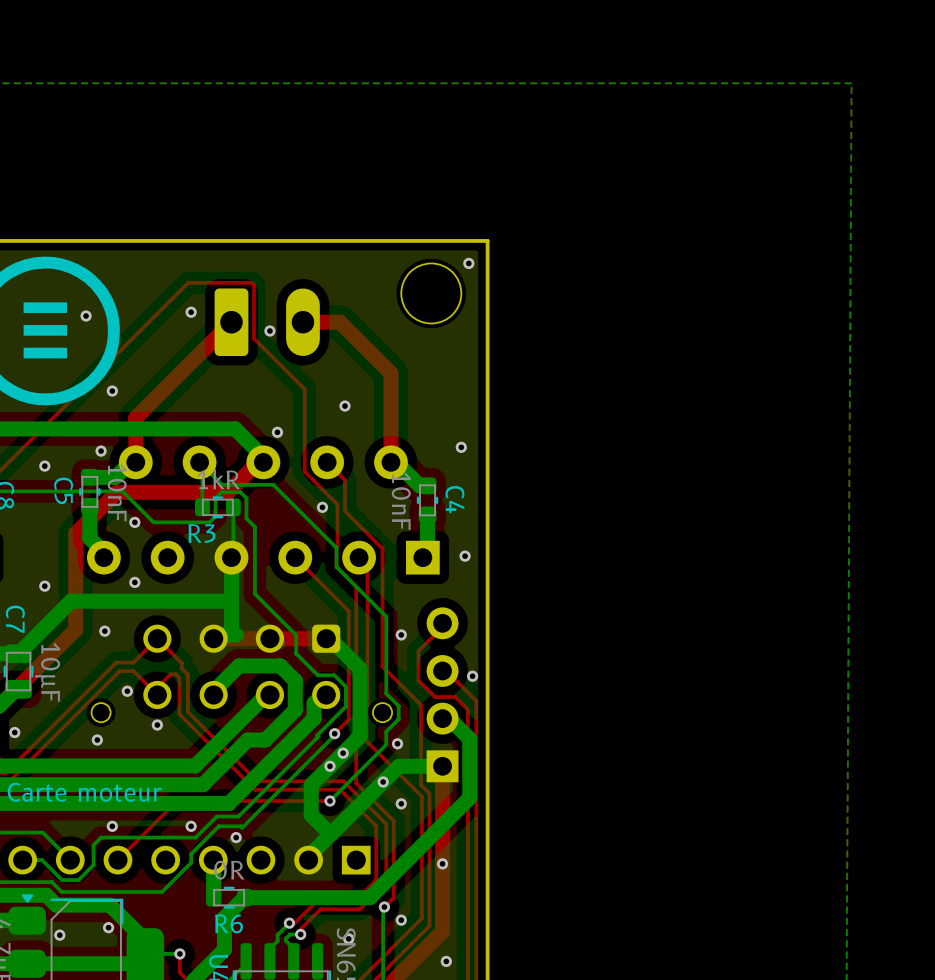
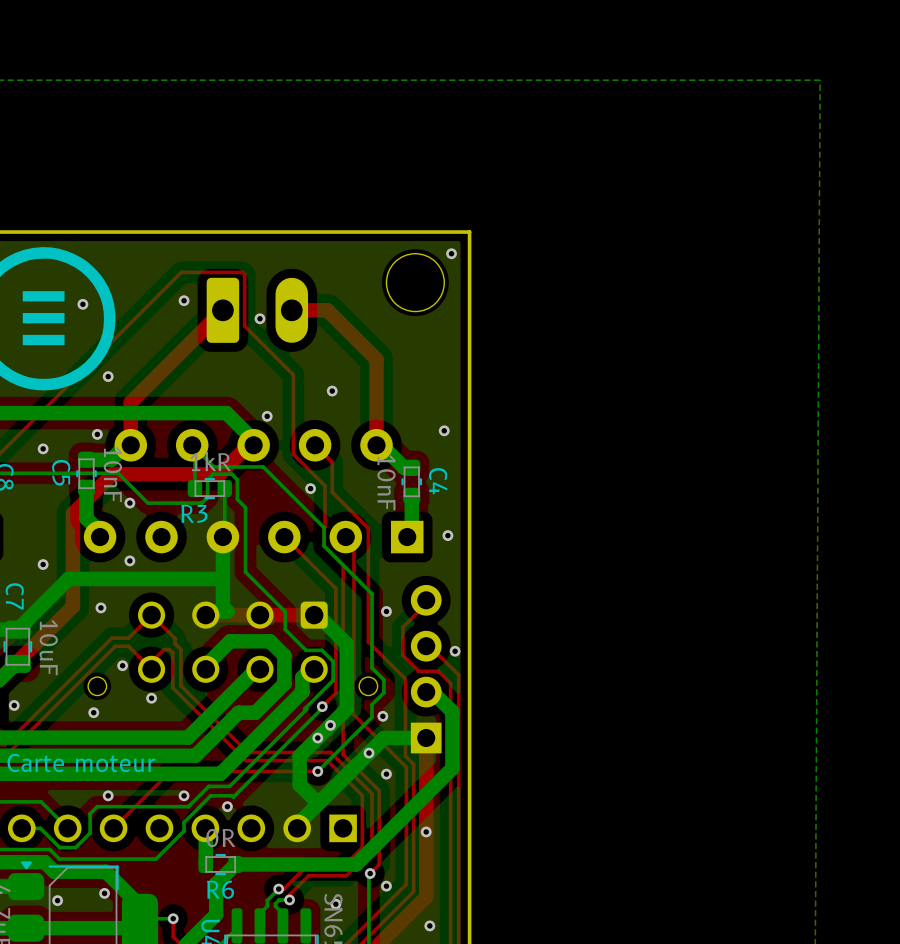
C7 value: 10µF (47, 672) -> 10uF (48, 647)

